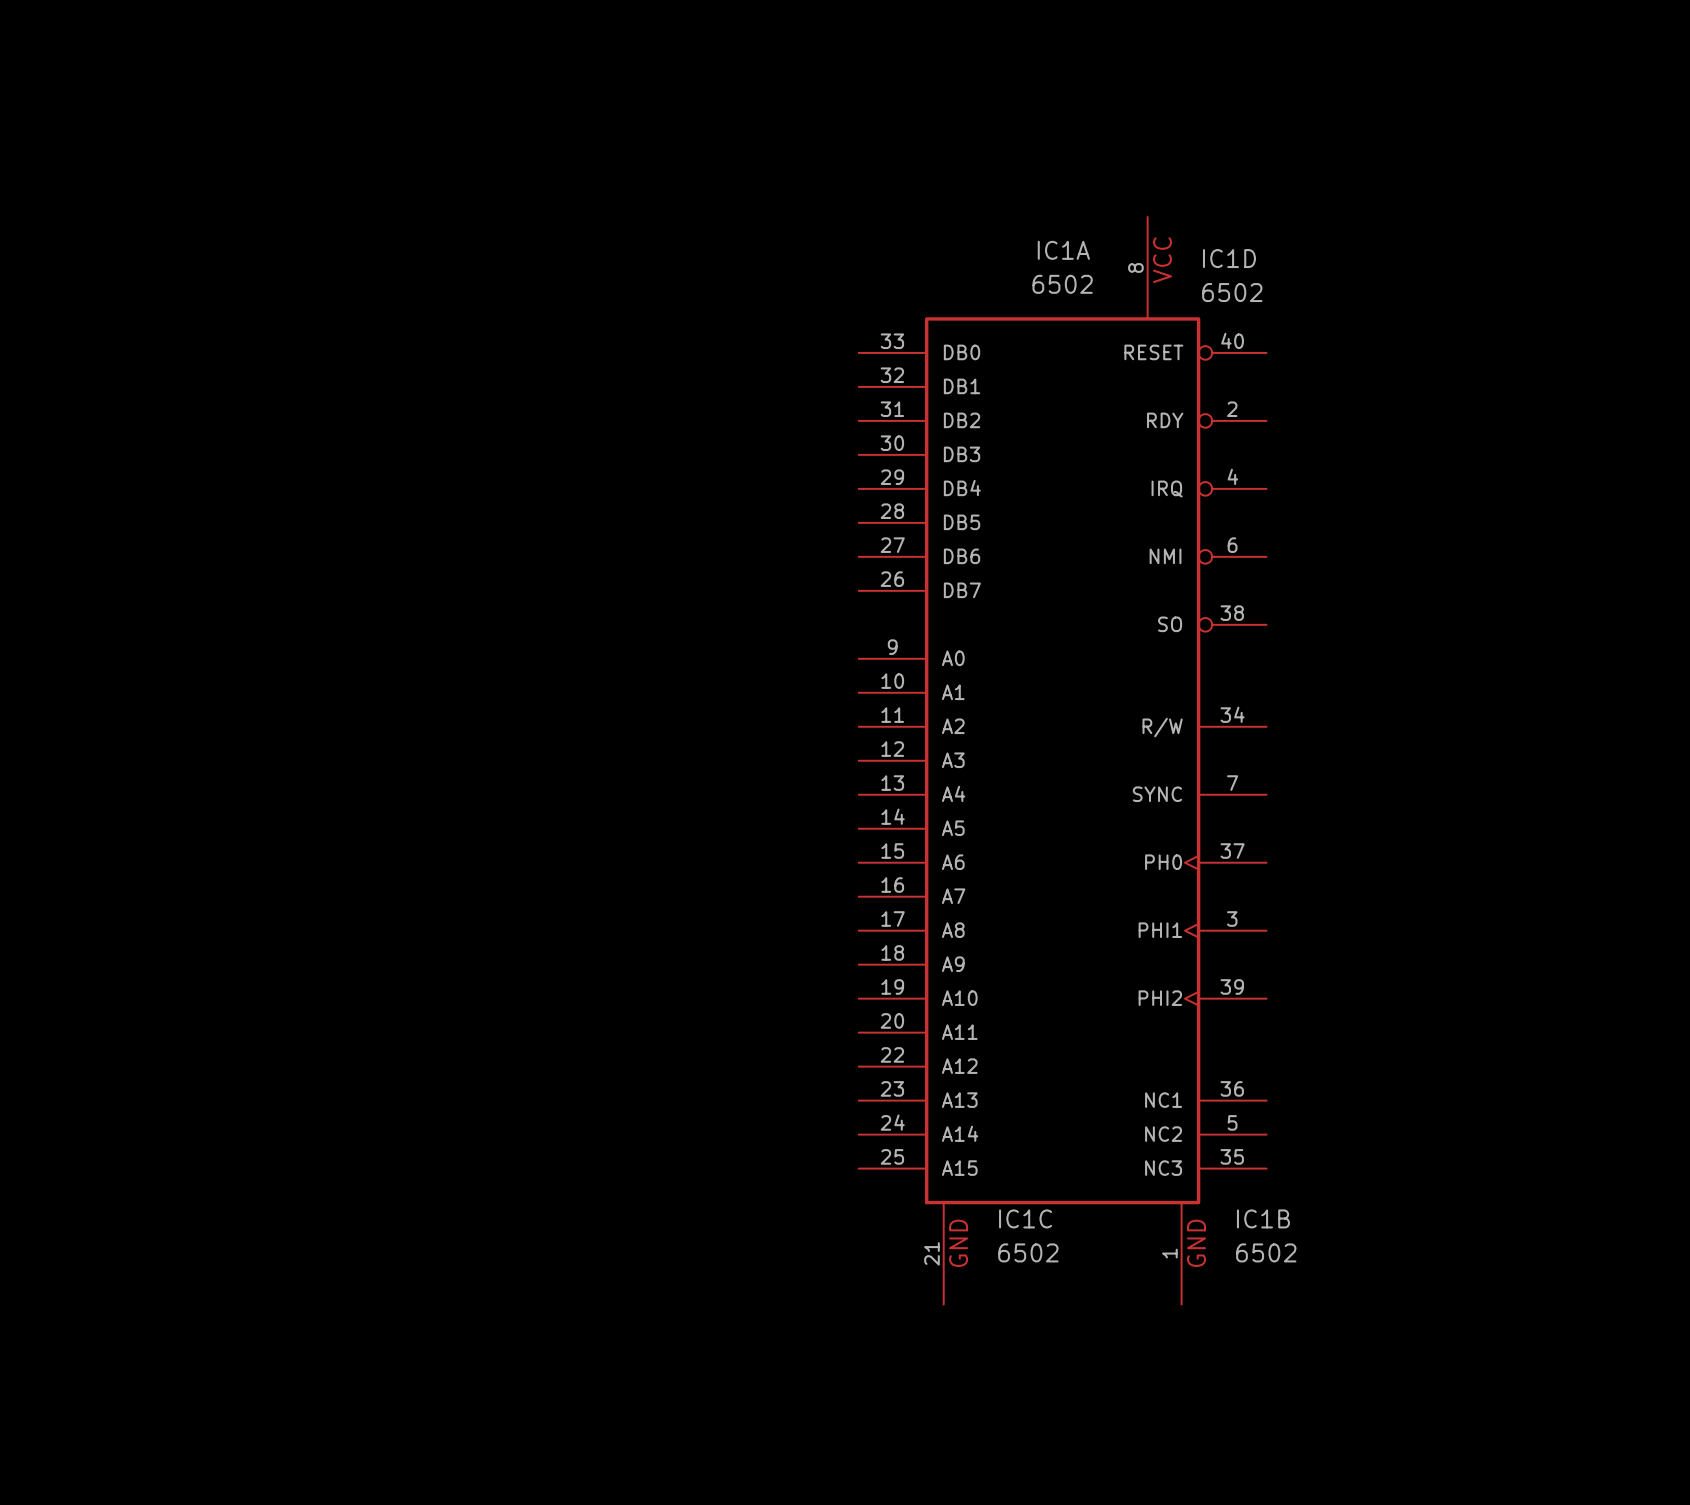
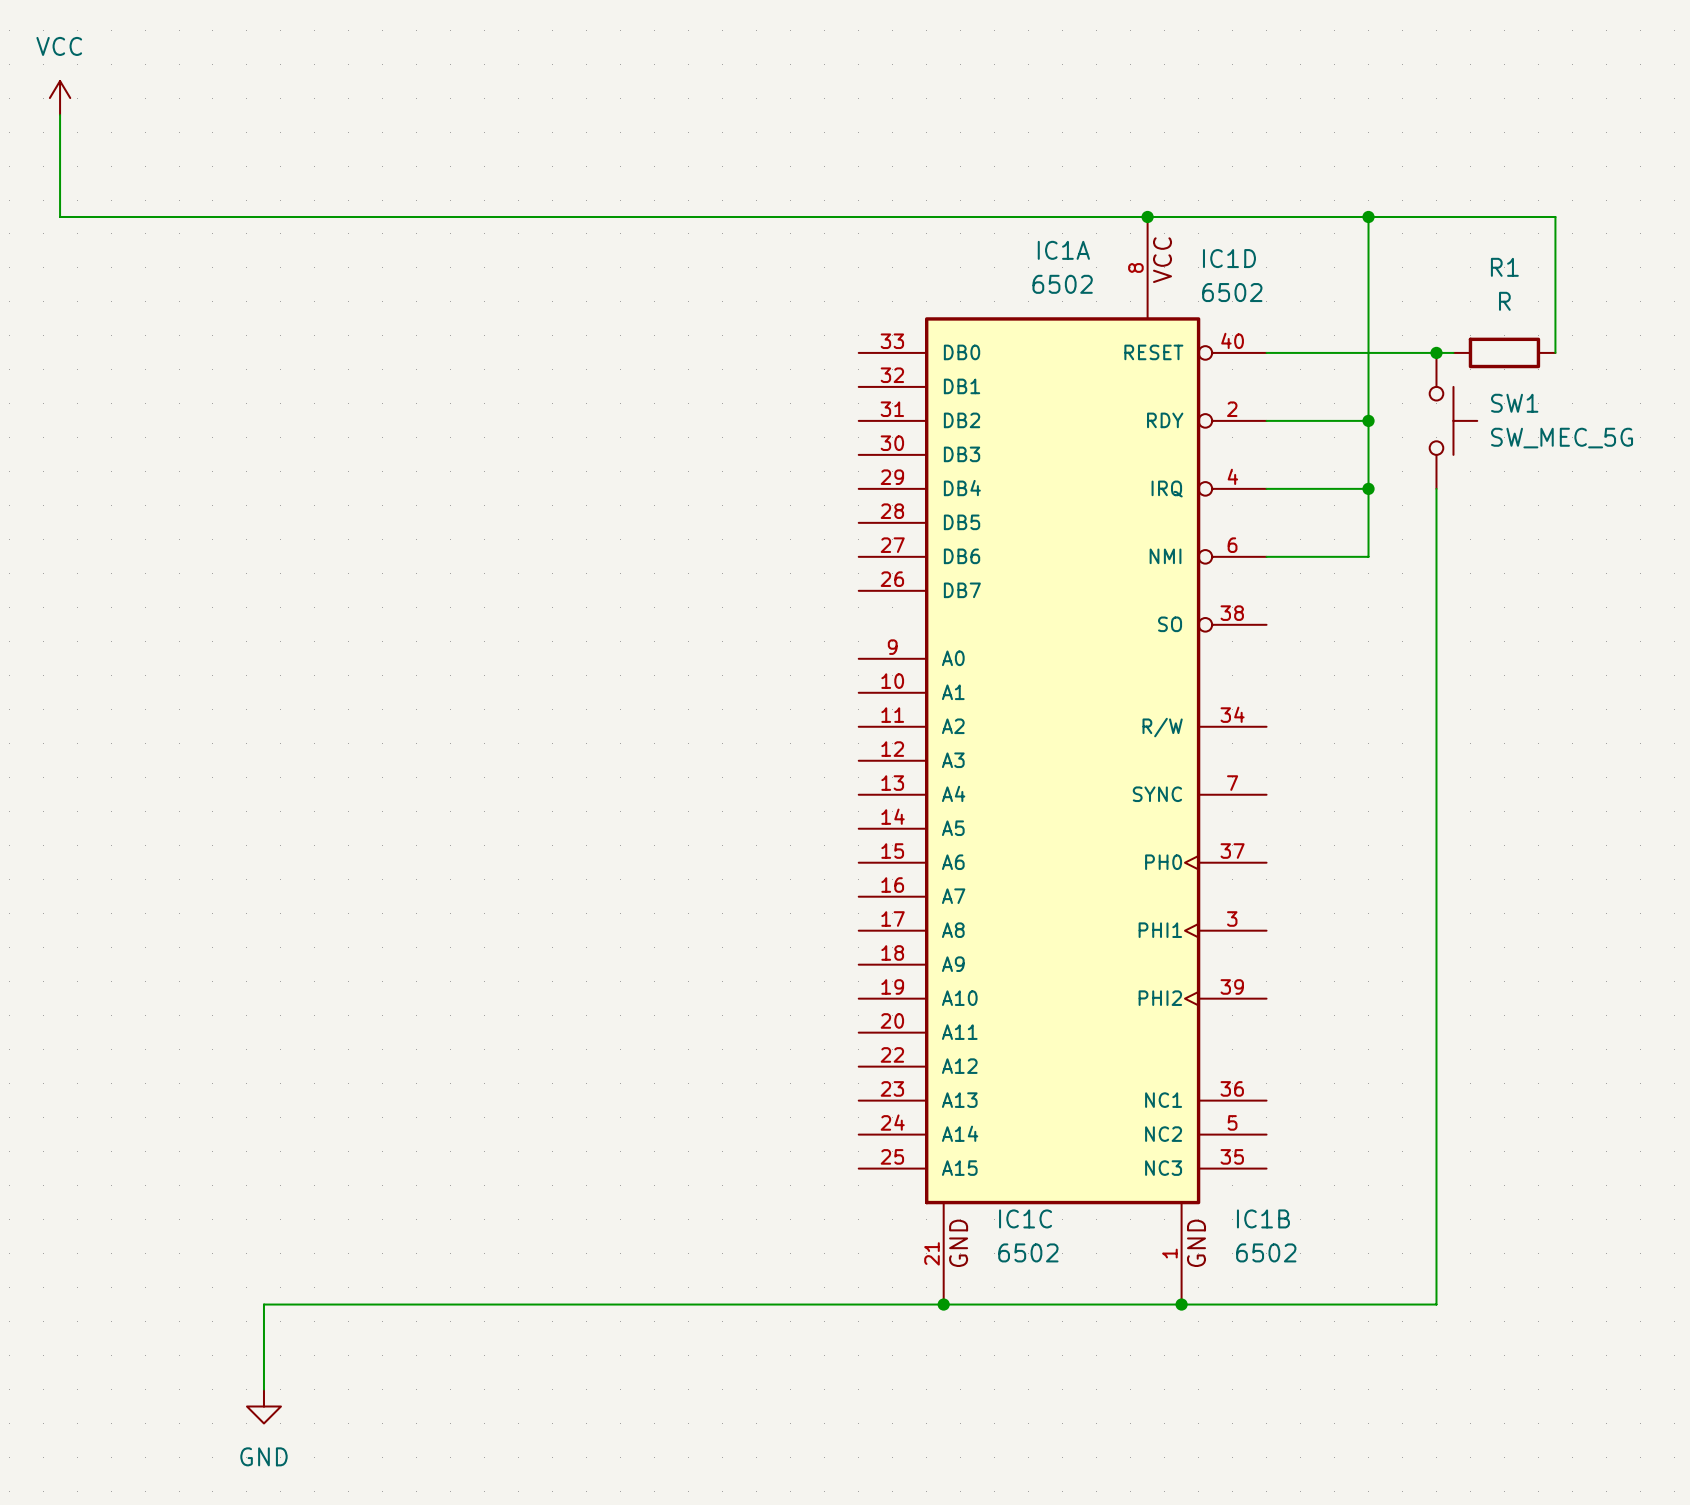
power symbol: none -> VCC (60, 98)
wire: none -> (60, 115) (60, 216) (1555, 216) (1555, 352)
junction: none -> (1147, 216)
wire: none -> (1368, 216) (1368, 556) (1266, 556)
junction: none -> (1368, 216)
wire: none -> (1266, 352) (1453, 352)
junction: none -> (1436, 352)
R1: none -> R (1504, 352)
wire: none -> (1266, 420) (1368, 420)
junction: none -> (1368, 420)
SW1: none -> SW_MEC_5G (1453, 420)
wire: none -> (1266, 488) (1368, 488)
junction: none -> (1368, 488)
wire: none -> (1436, 488) (1436, 1304) (263, 1304) (263, 1389)
junction: none -> (943, 1304)
junction: none -> (1181, 1304)
power symbol: none -> GND (263, 1406)

